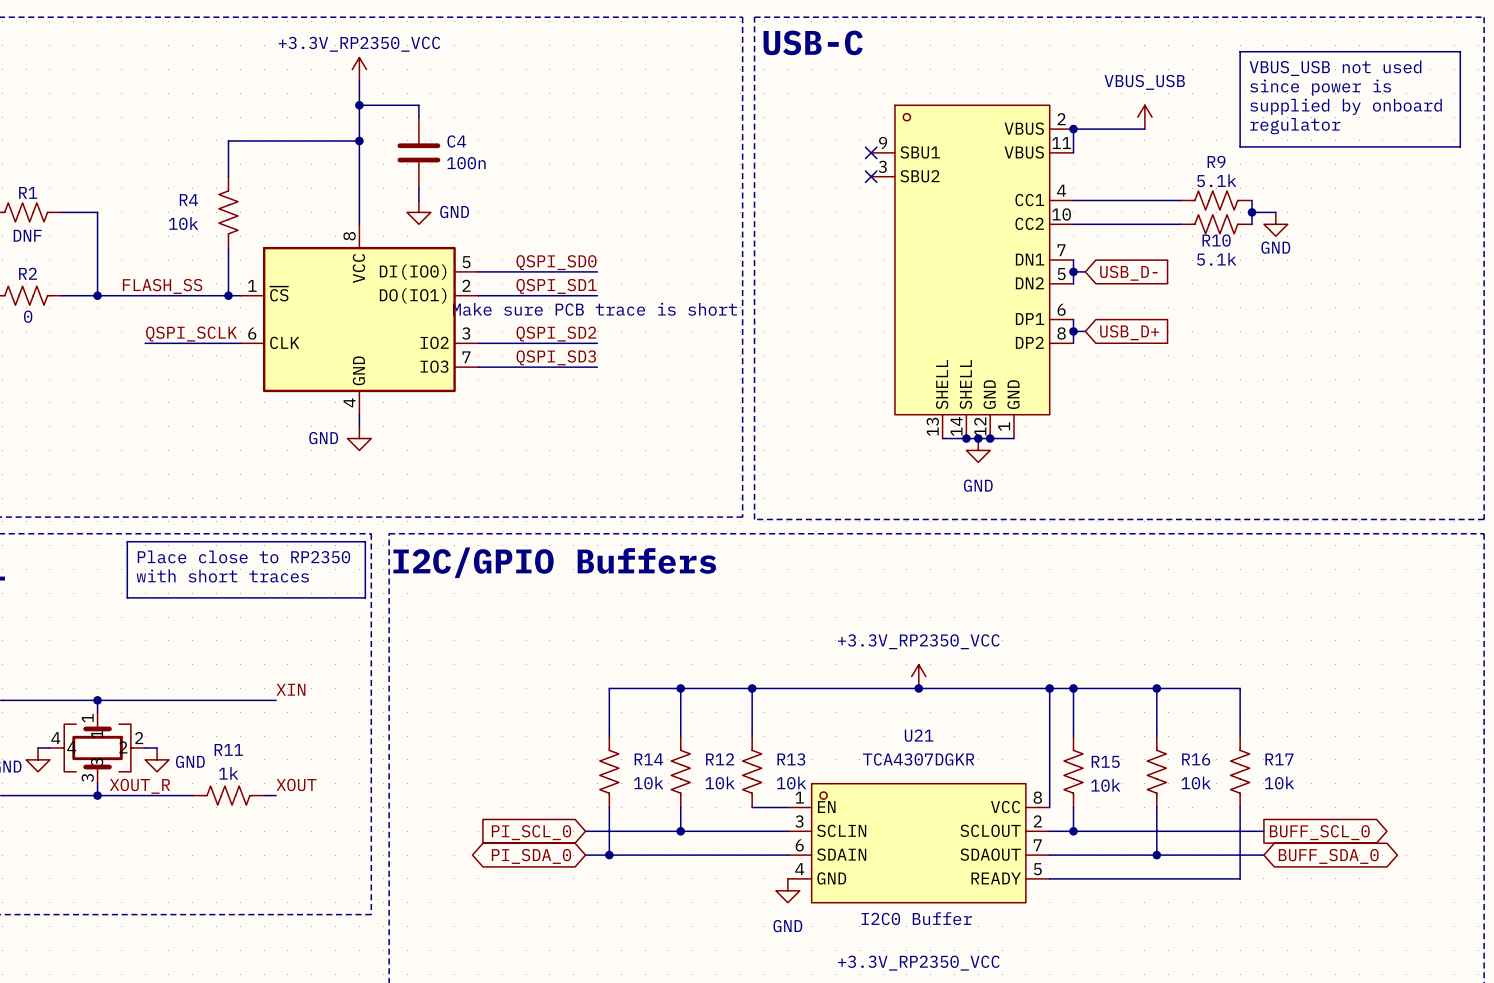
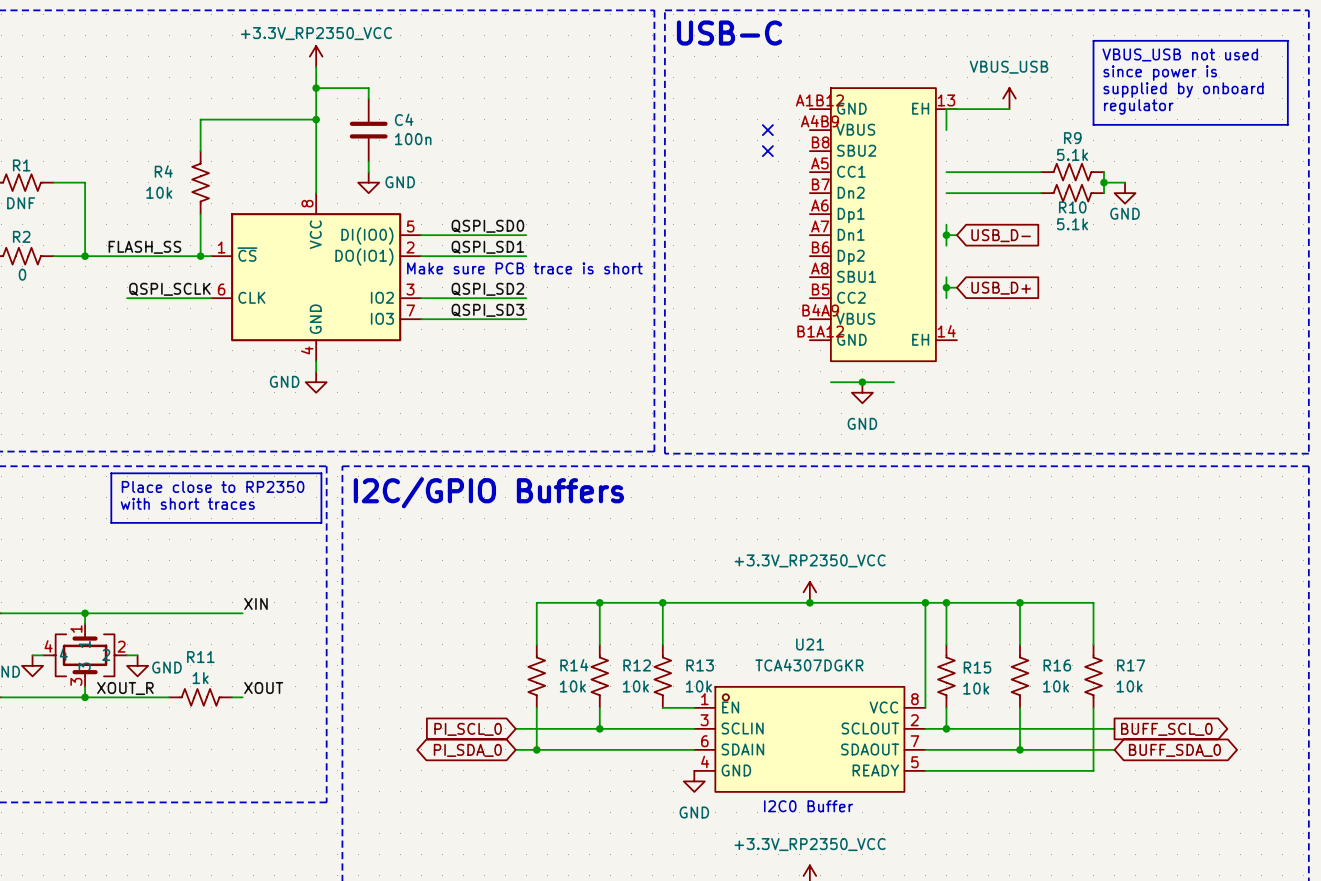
junction: (1073, 129) -> none
part: none -> (883, 224)
part: (972, 271) -> none
junction: (966, 438) -> none
junction: (990, 438) -> none

